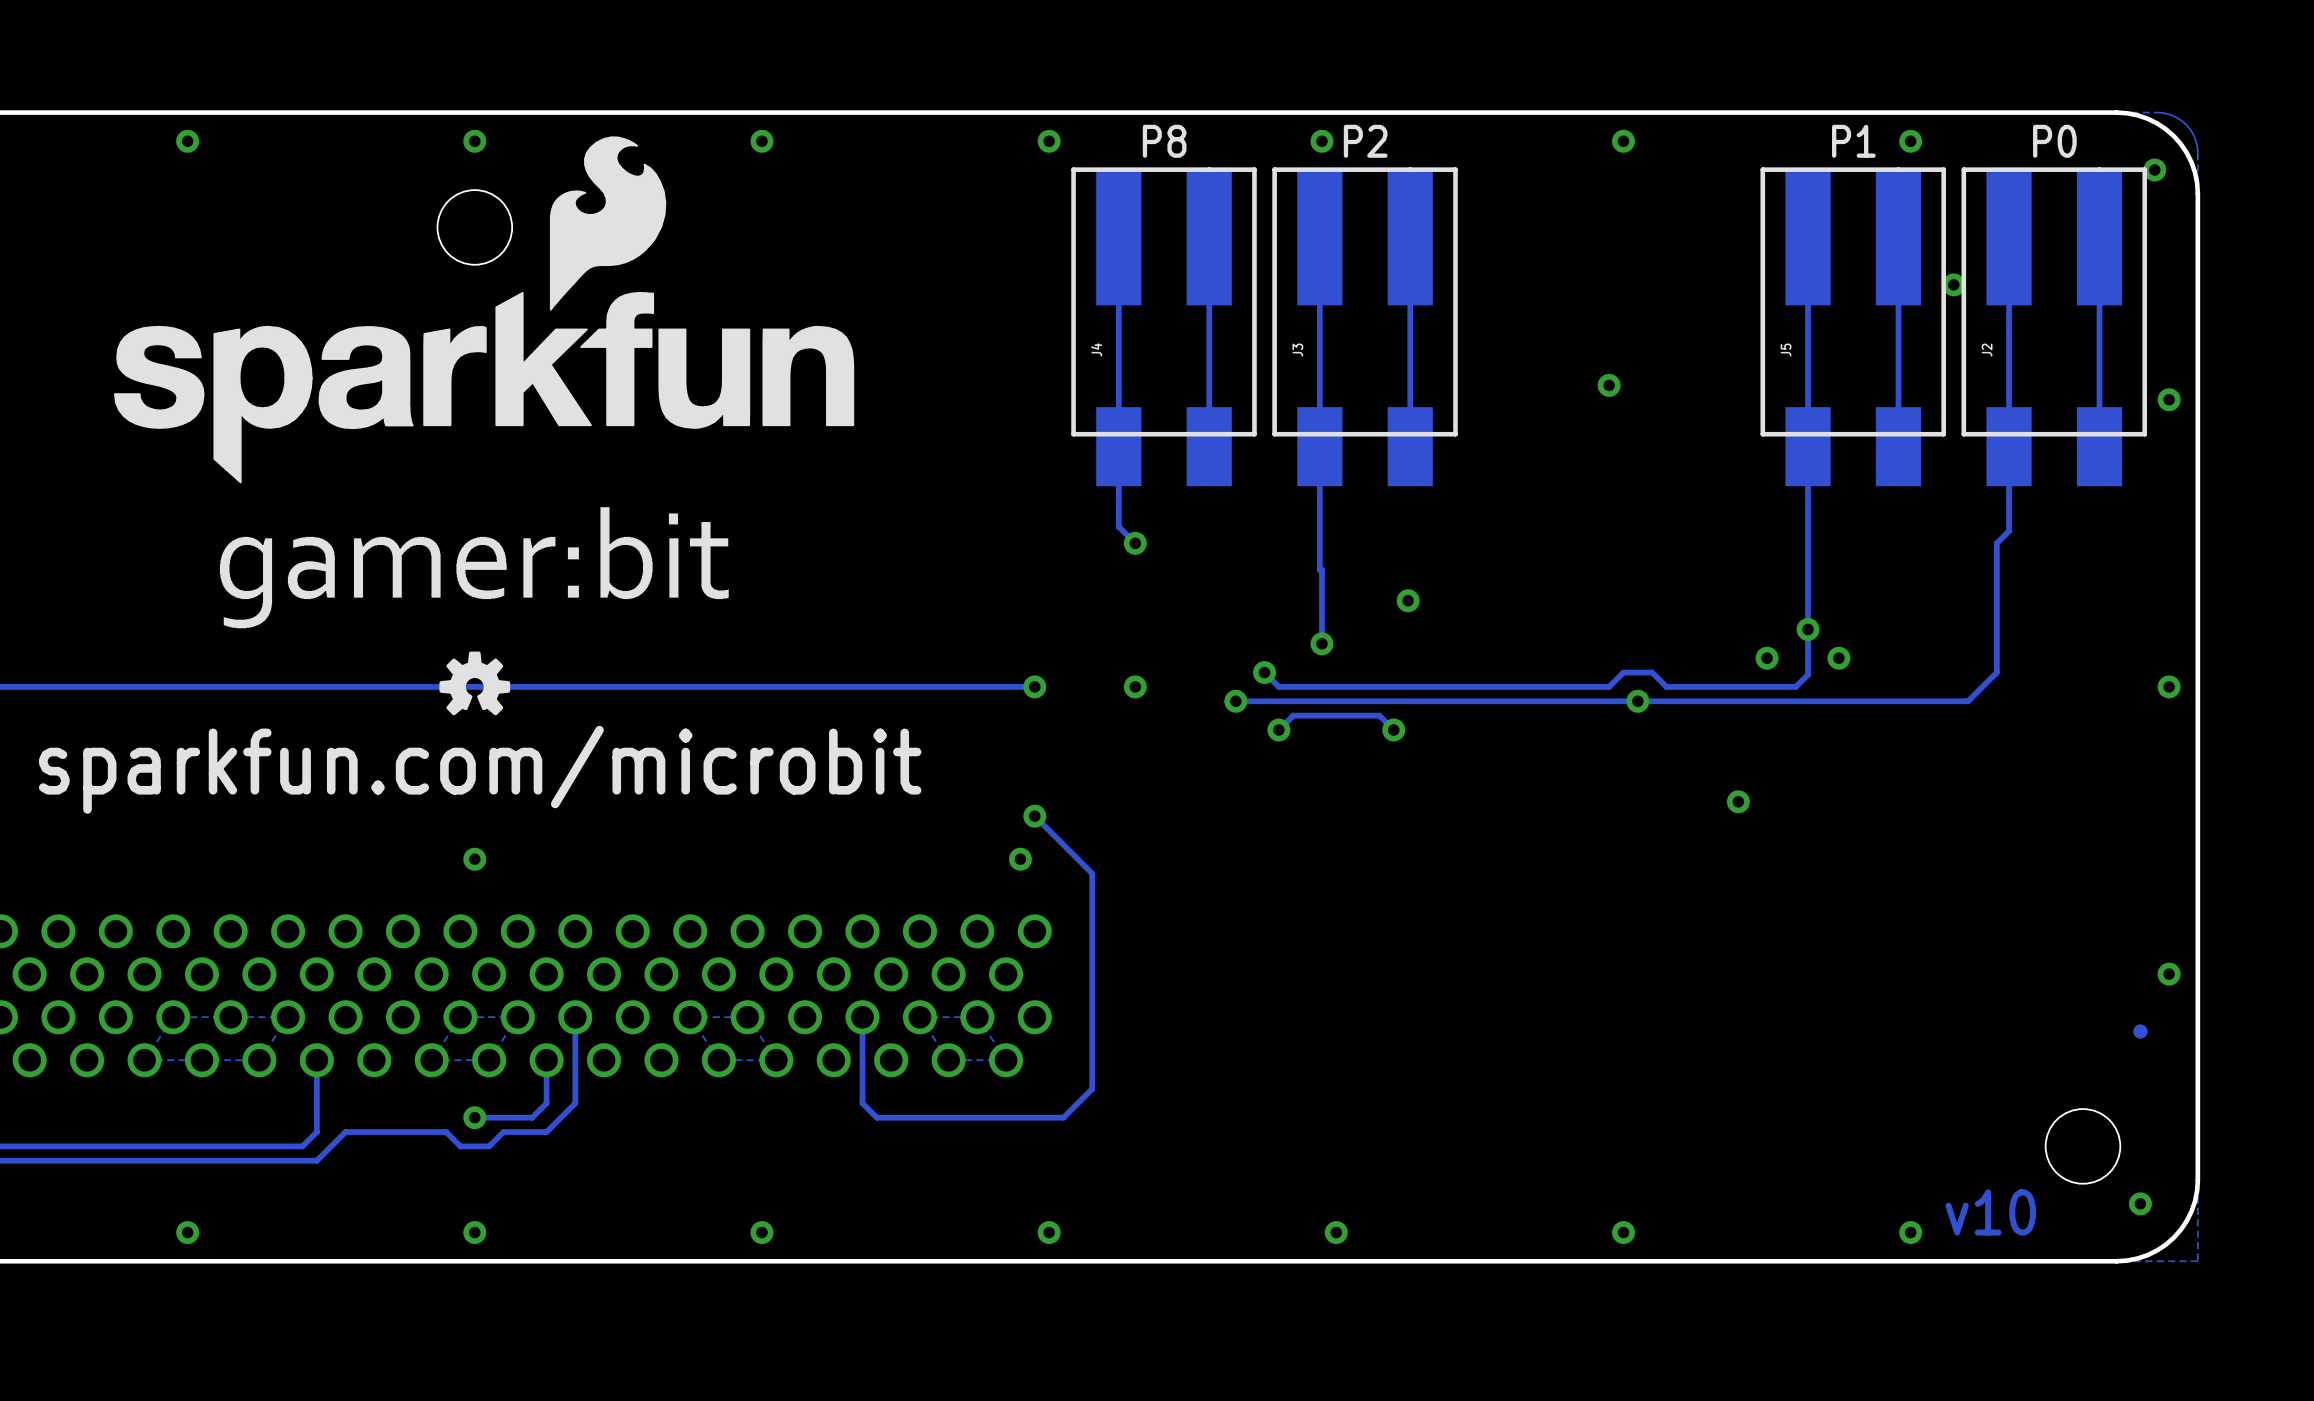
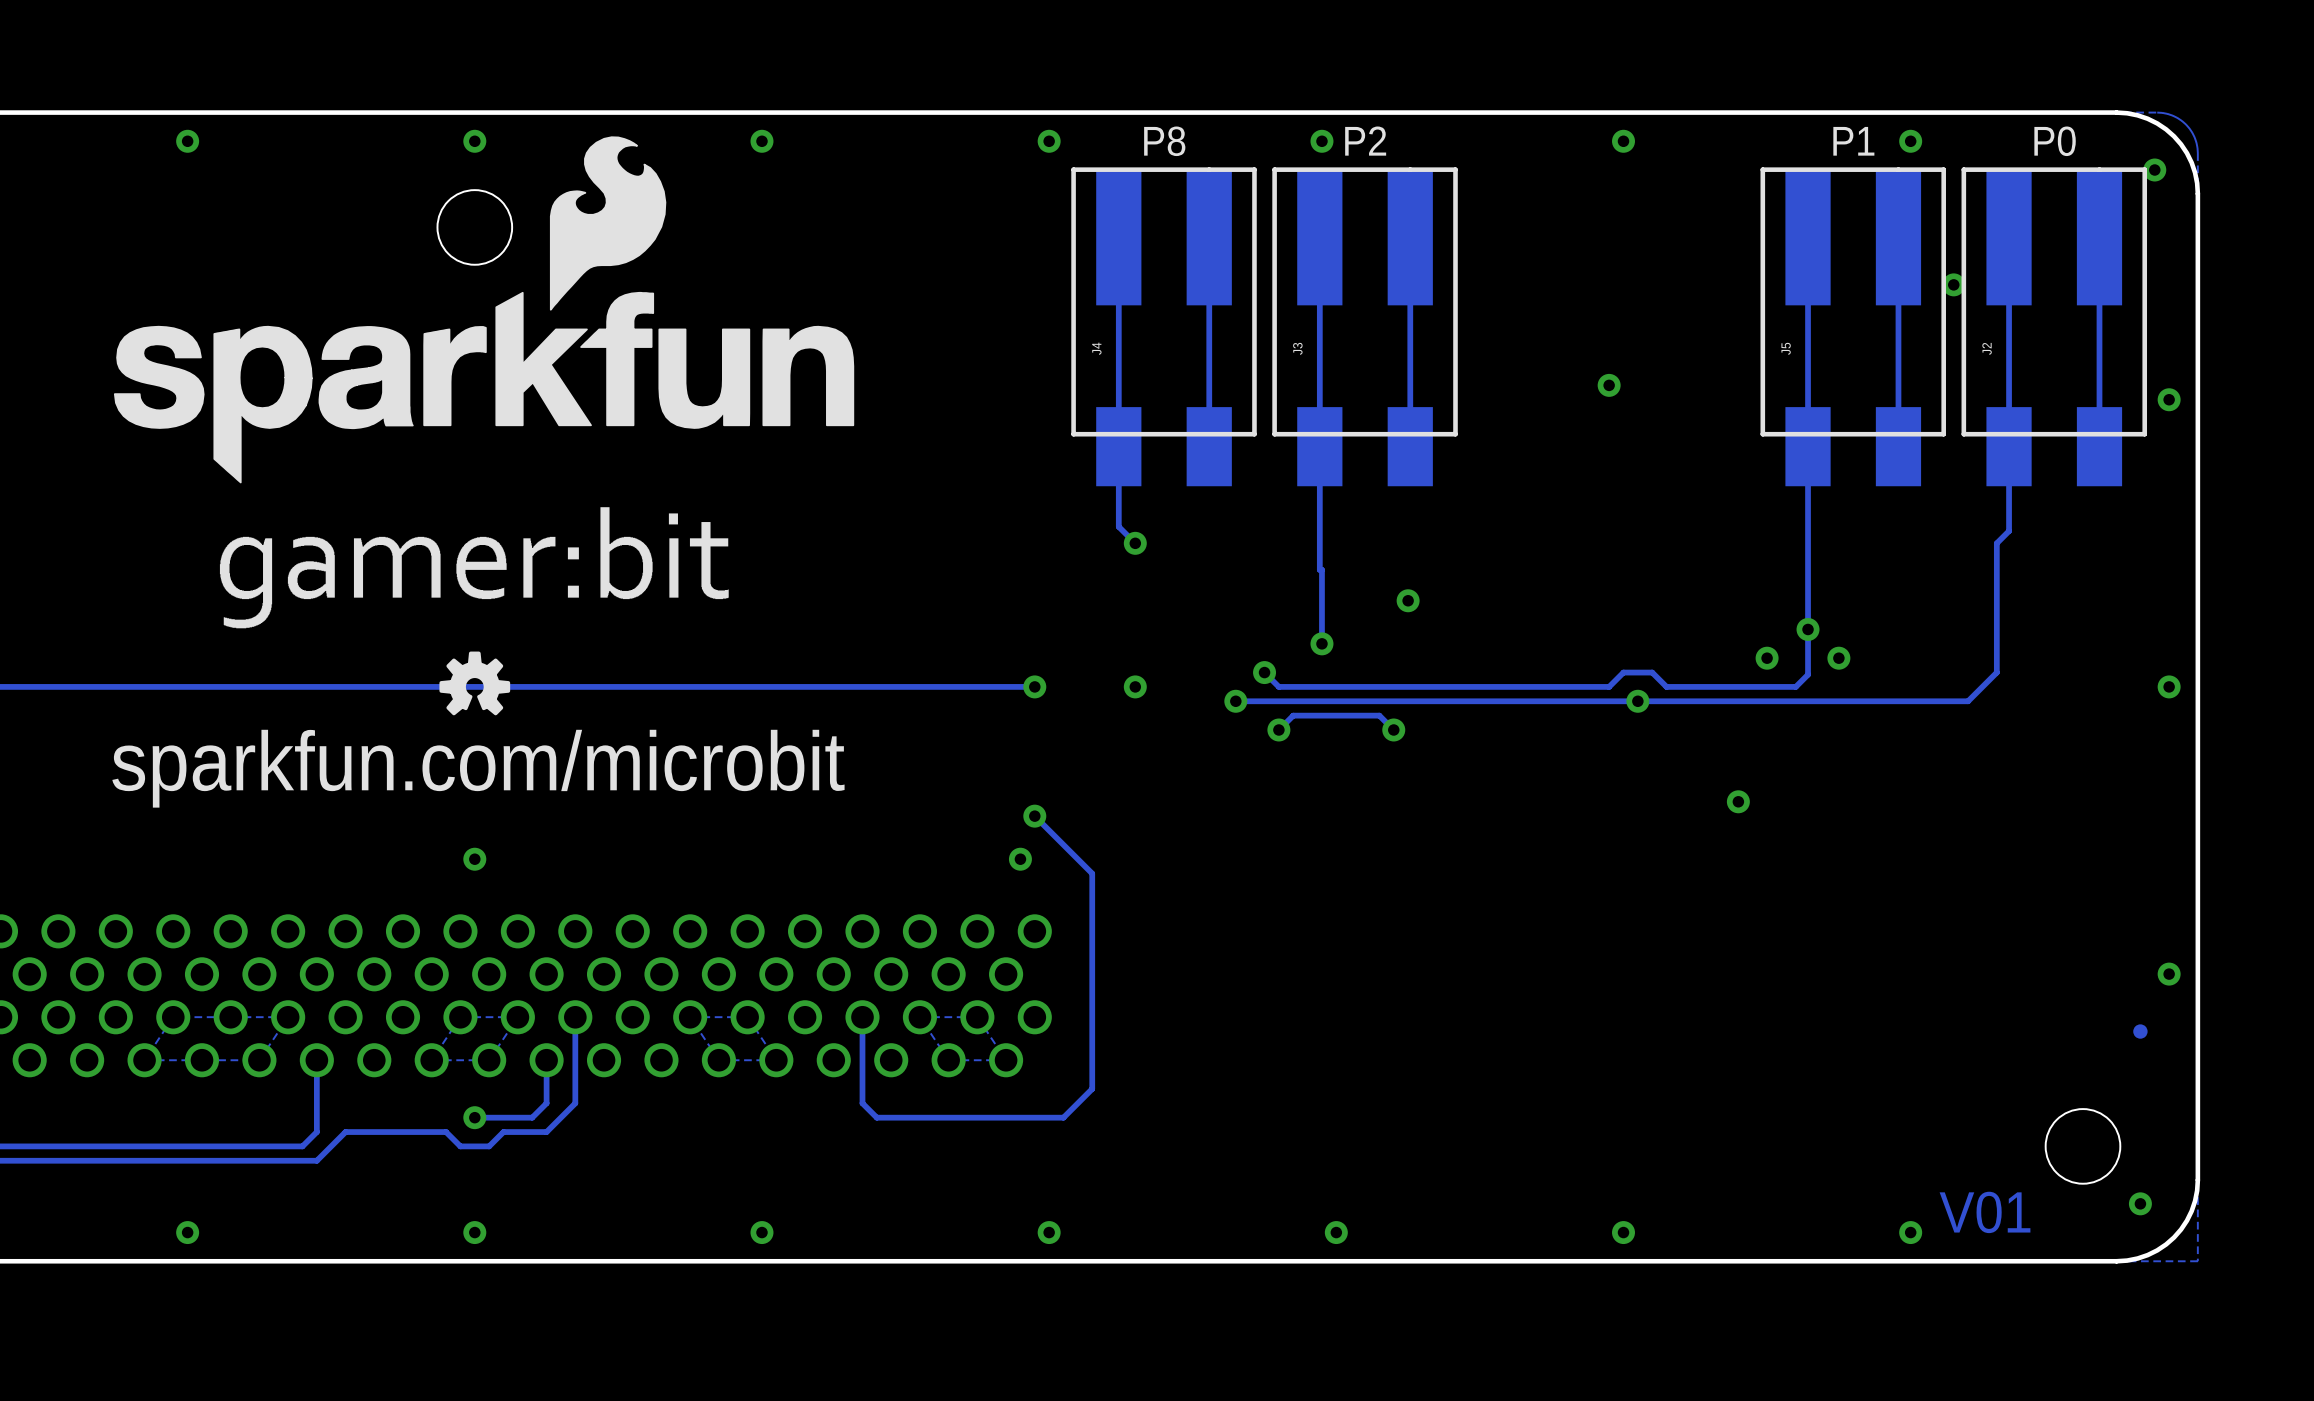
text: v10 (1990, 1212) -> V01 (1985, 1212)

